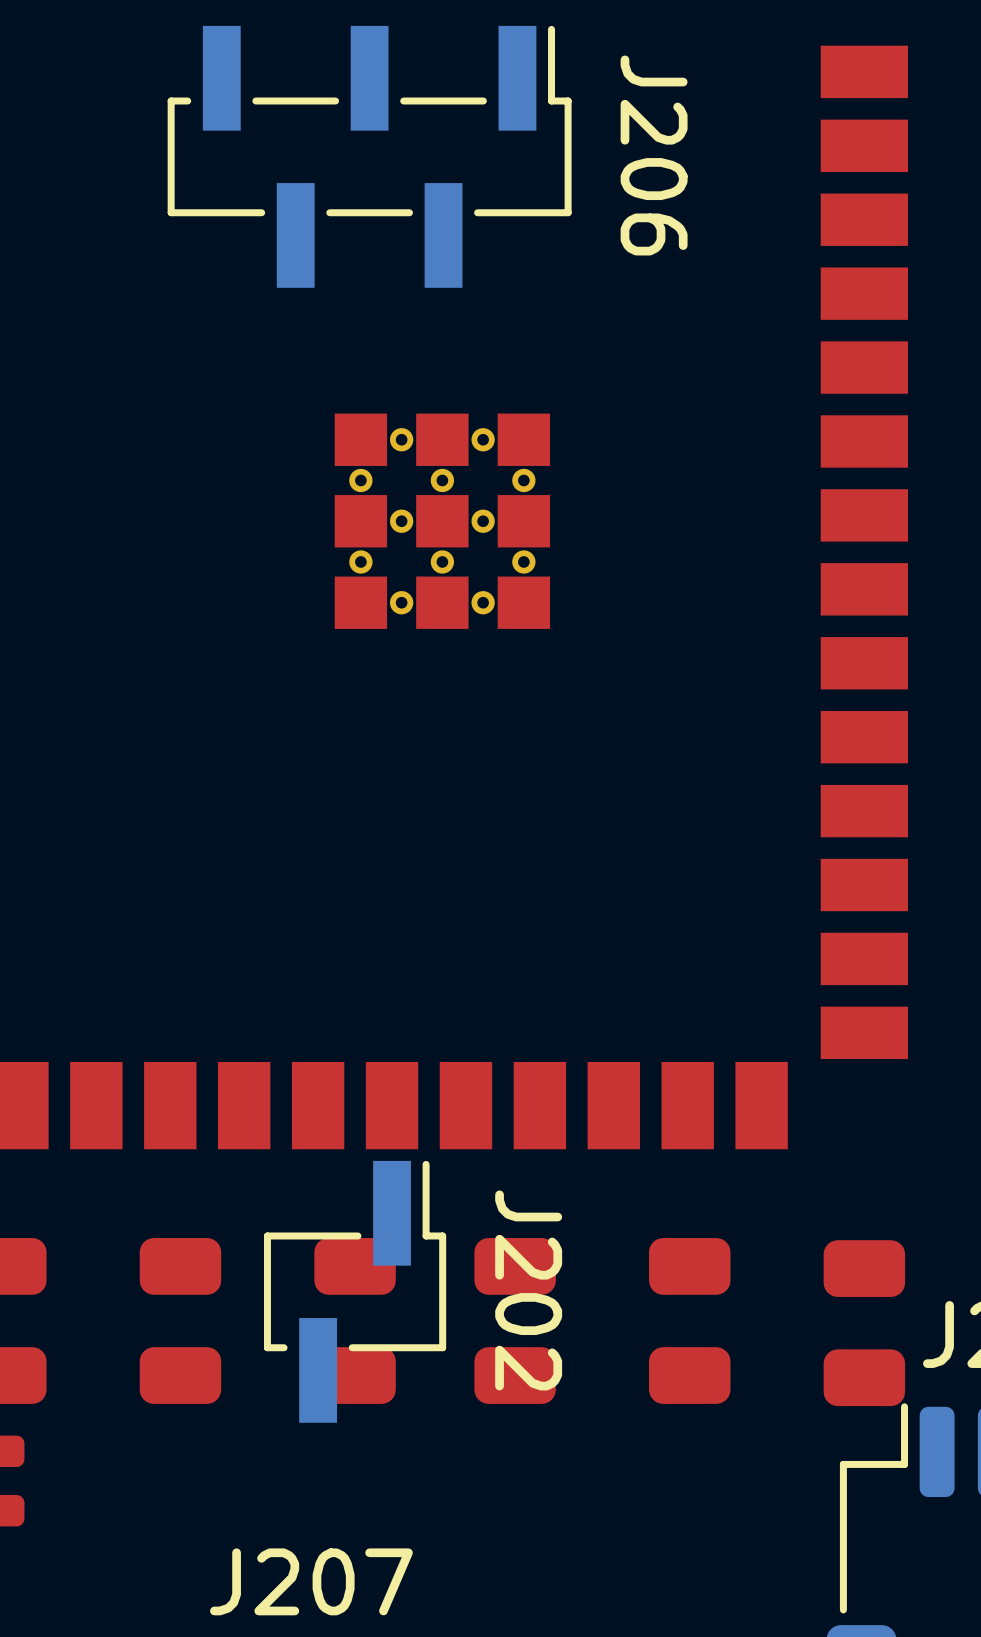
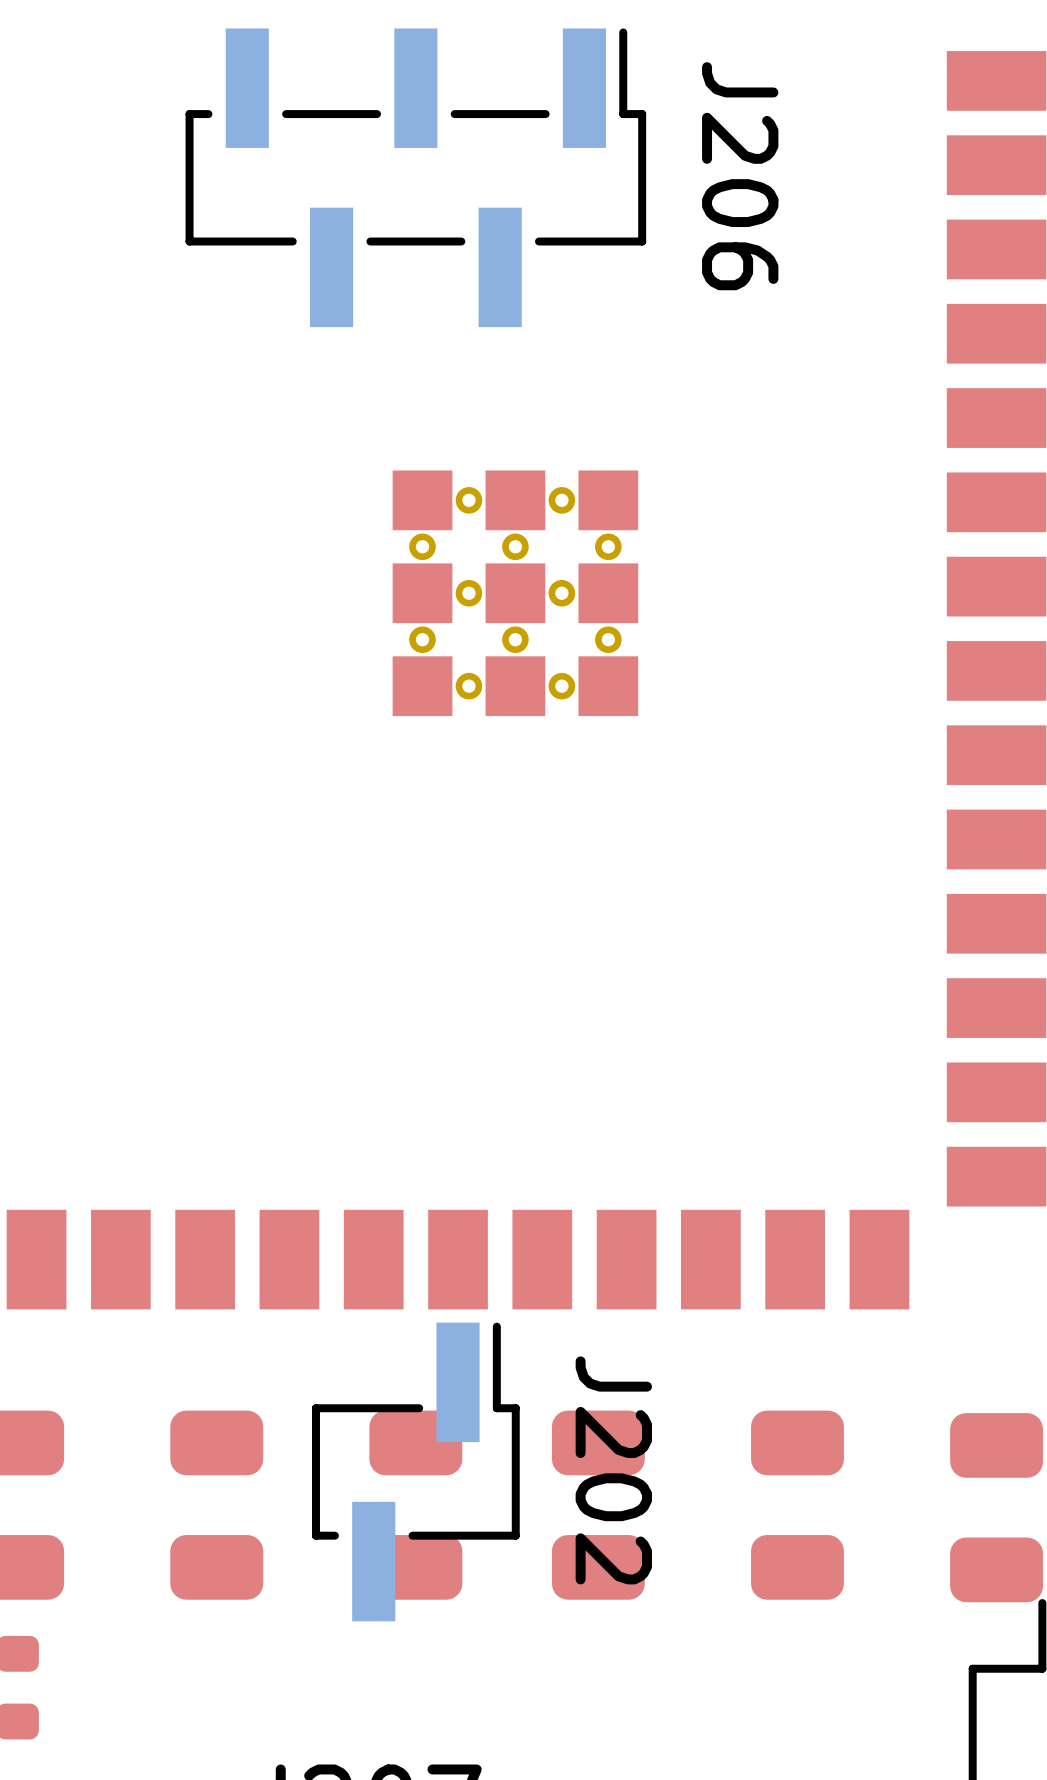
J206 position: (369, 156) -> (415, 177)

